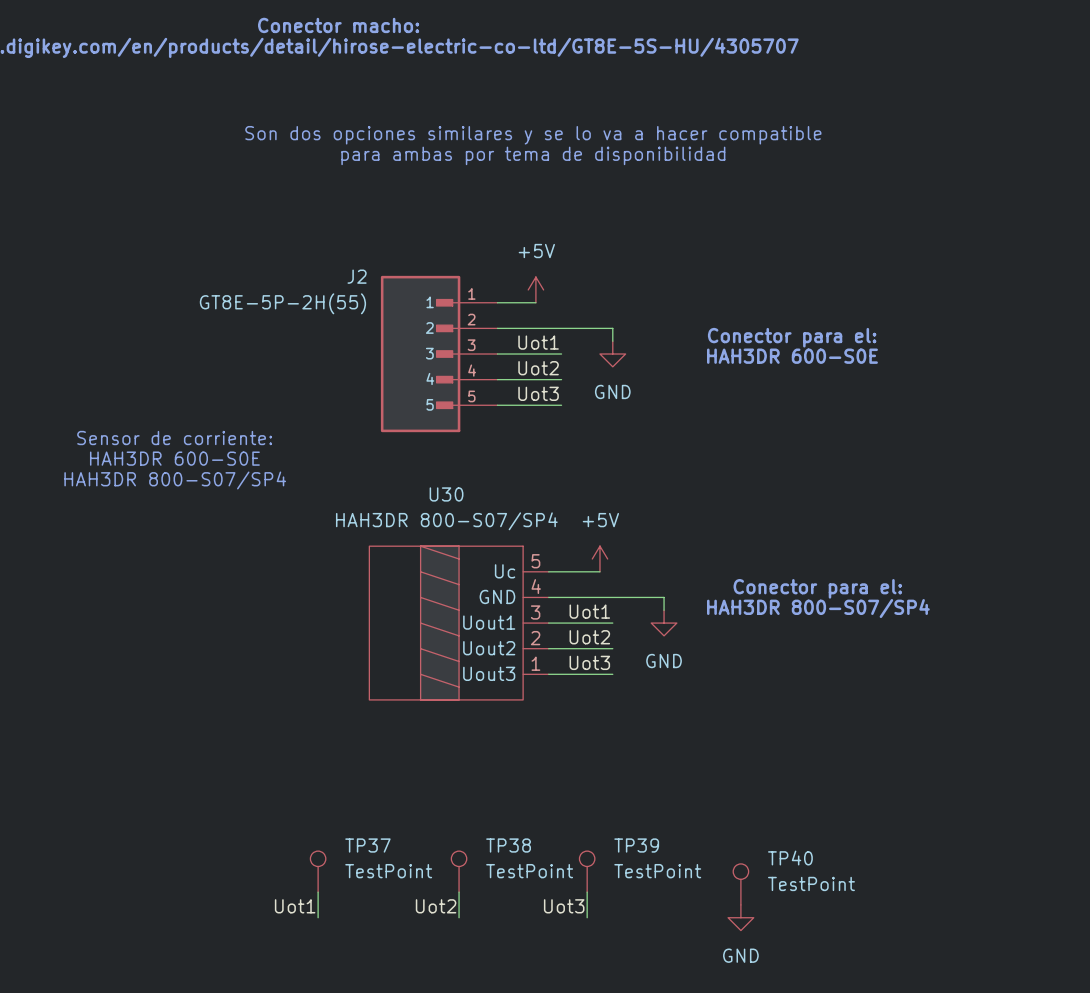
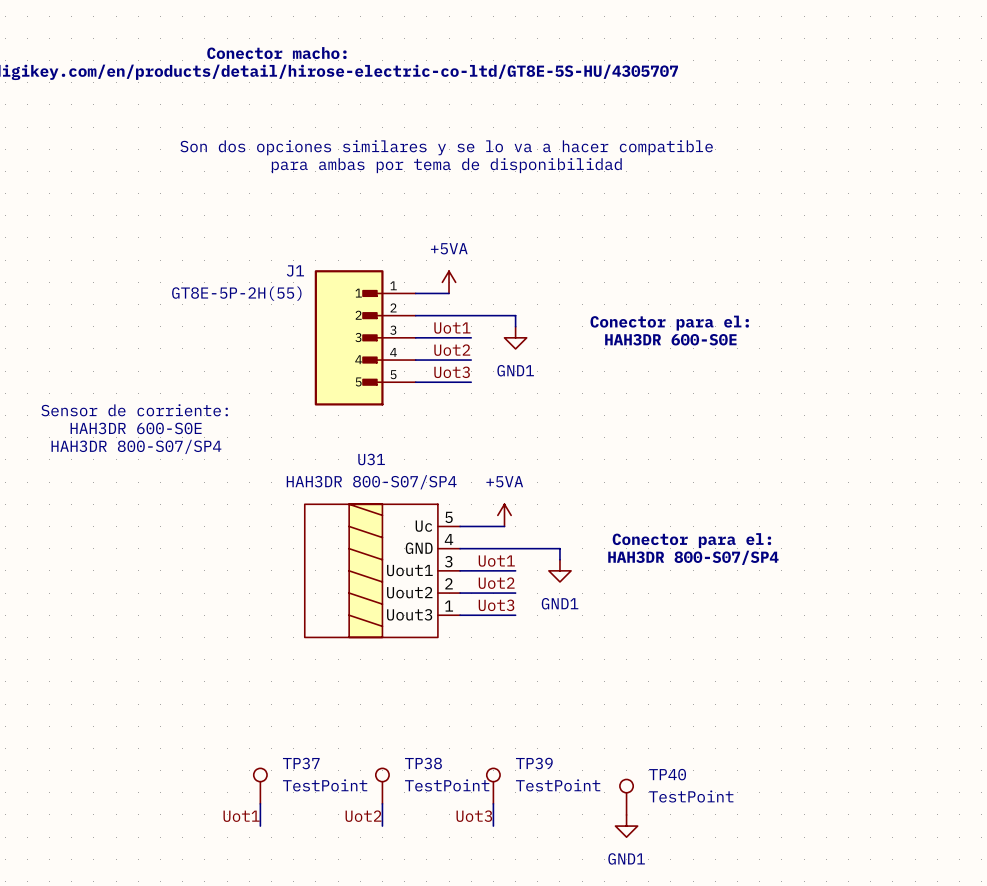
J2 name: J2 (357, 276) -> J1 (295, 270)
power symbol: +5V (535, 289) -> +5VA (449, 282)
power symbol: GND (612, 354) -> GND1 (515, 337)
U30 name: U30 (446, 494) -> U31 (371, 459)
power symbol: +5V (599, 559) -> +5VA (504, 515)
power symbol: GND (664, 623) -> GND1 (559, 570)
power symbol: GND (740, 917) -> GND1 (626, 826)

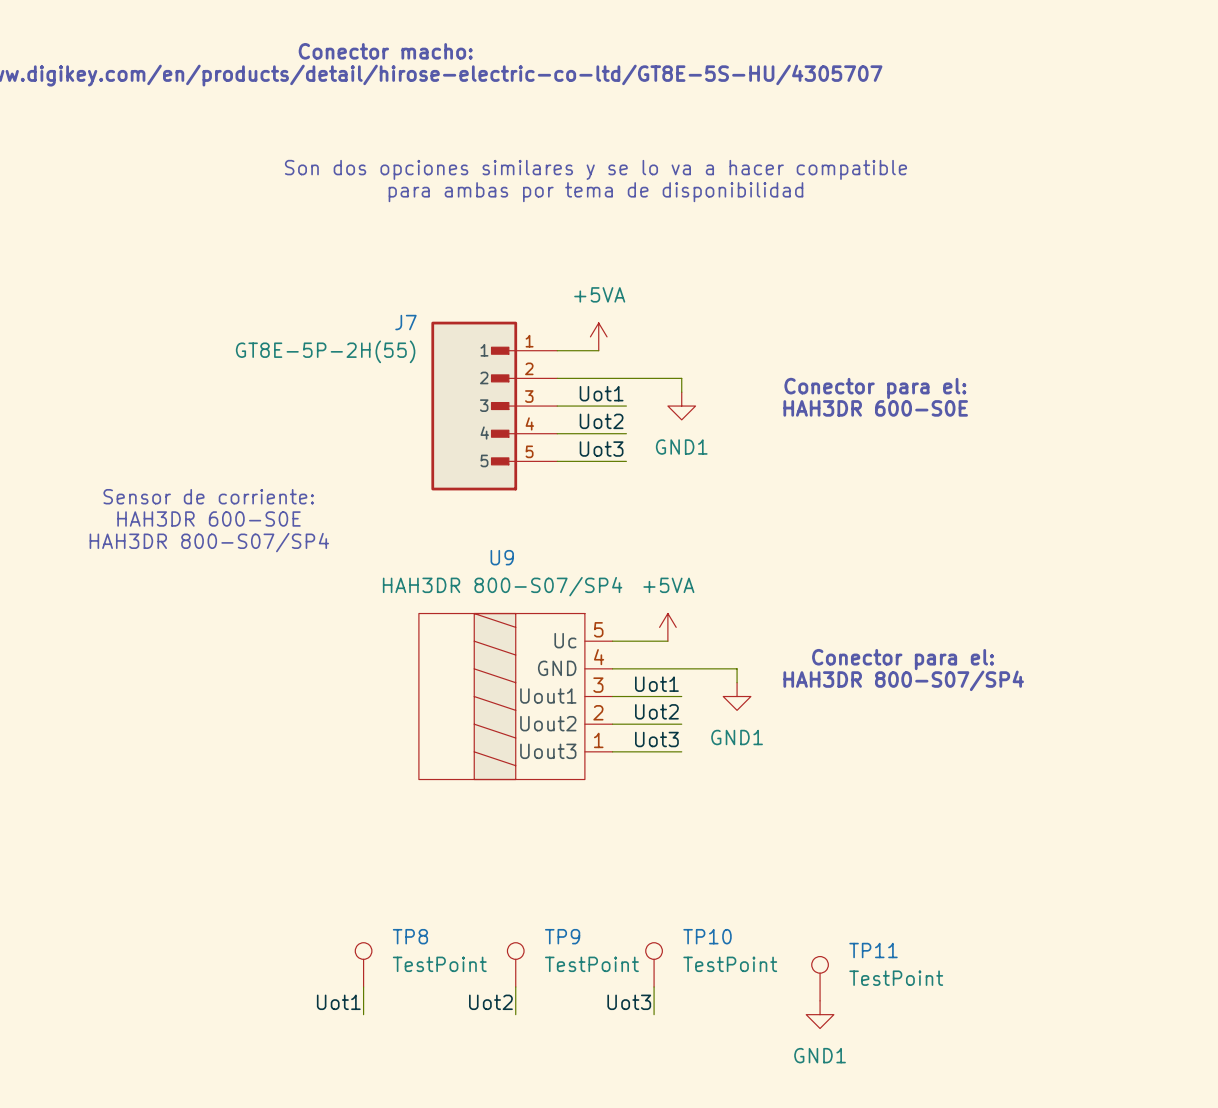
J1 name: J1 (295, 270) -> J7 (405, 322)
U31 name: U31 (371, 459) -> U9 (502, 557)
TP37 name: TP37 (301, 763) -> TP8 (410, 936)
TP38 name: TP38 (423, 763) -> TP9 (562, 936)
TP39 name: TP39 (534, 763) -> TP10 (707, 936)
TP40 name: TP40 (667, 774) -> TP11 (873, 950)

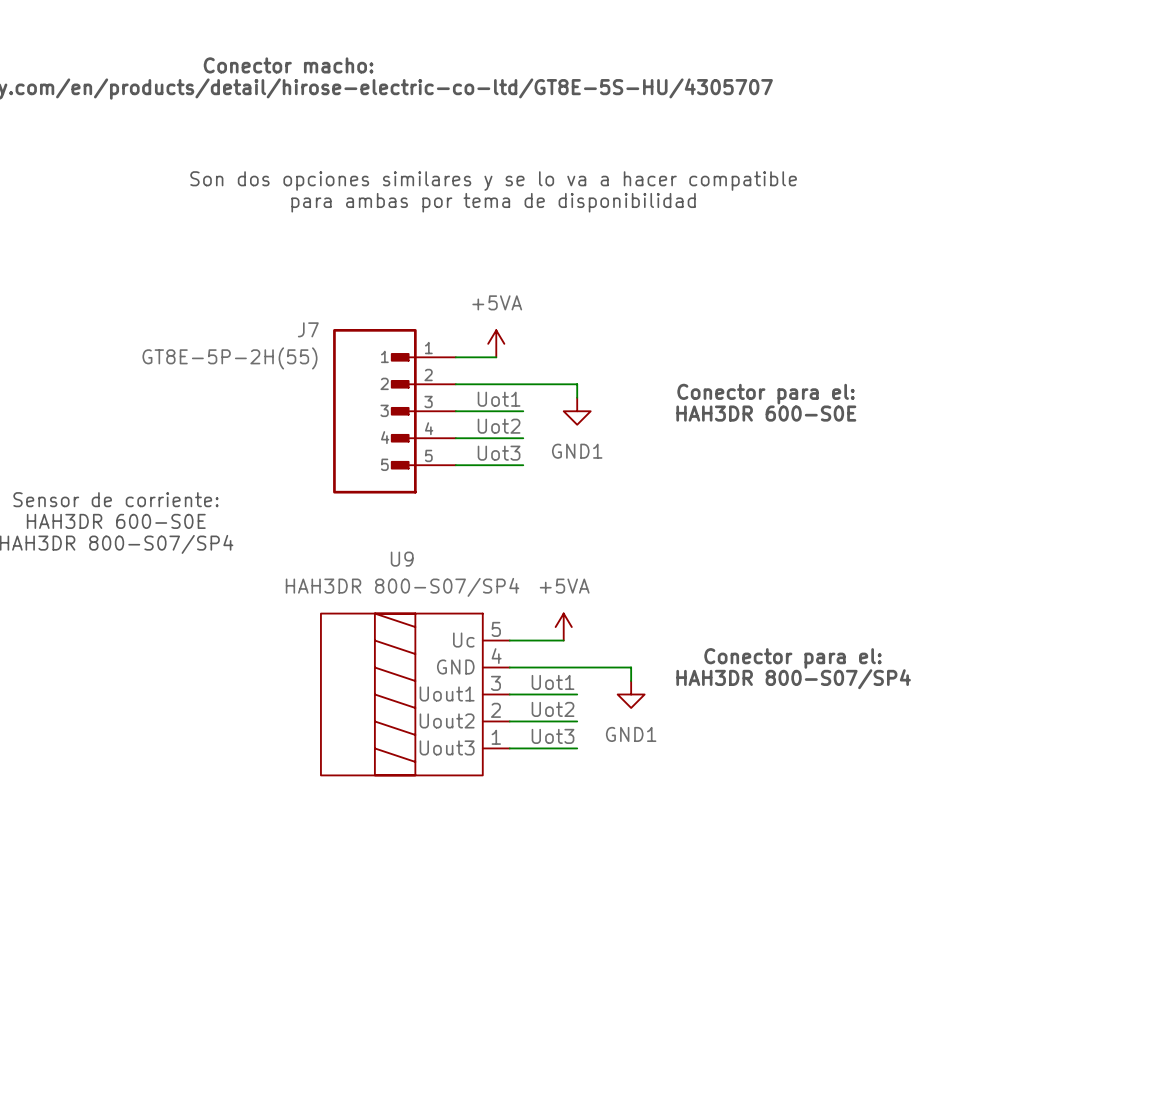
TP8: TestPoint (363, 964) -> none
TP9: TestPoint (515, 964) -> none
TP10: TestPoint (654, 964) -> none
TP11: TestPoint (820, 978) -> none
wire: (363, 986) (363, 1014) -> none
wire: (515, 986) (515, 1014) -> none
wire: (654, 986) (654, 1014) -> none
label: Uot1 (338, 1002) -> none
label: Uot2 (490, 1002) -> none
label: Uot3 (629, 1002) -> none
power symbol: GND1 (820, 1014) -> none

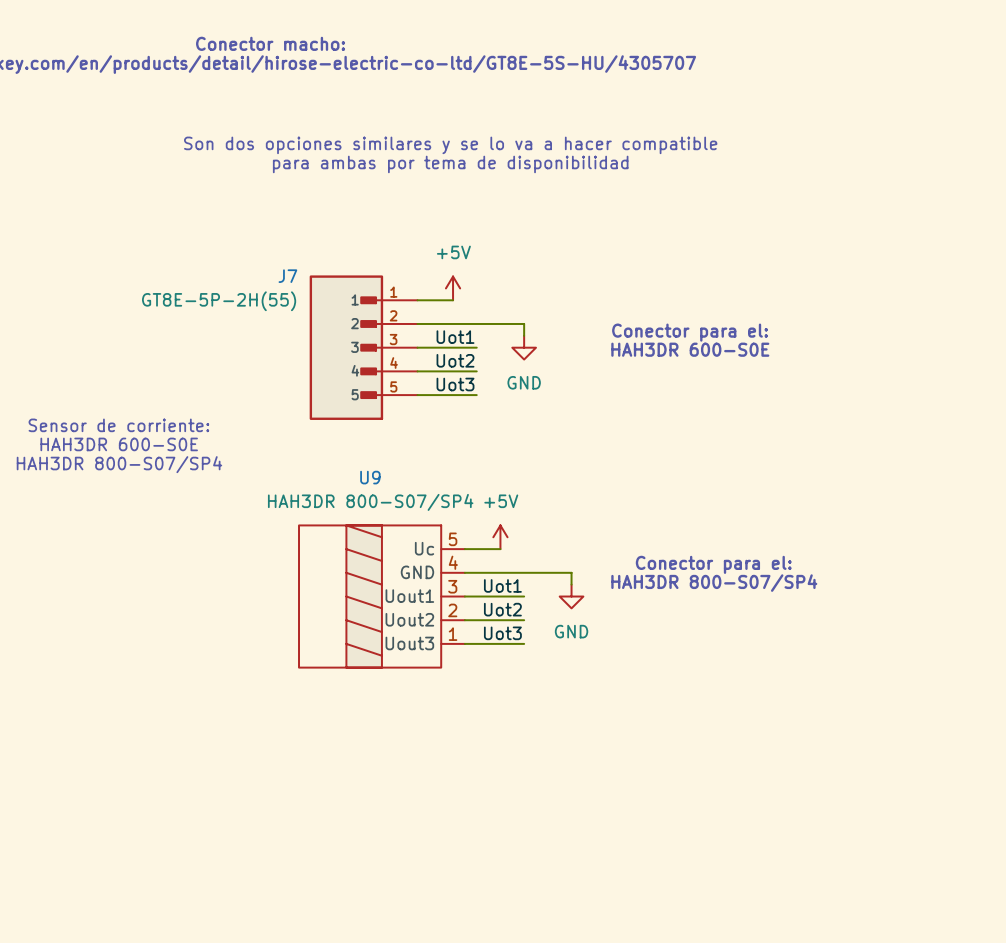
power symbol: +5VA (496, 343) -> +5V (453, 288)
power symbol: GND1 (577, 411) -> GND (524, 347)
power symbol: none -> +5V (500, 537)
power symbol: +5VA (563, 627) -> none
wire: (550, 640) (563, 640) -> none
power symbol: GND1 (631, 694) -> GND (571, 596)

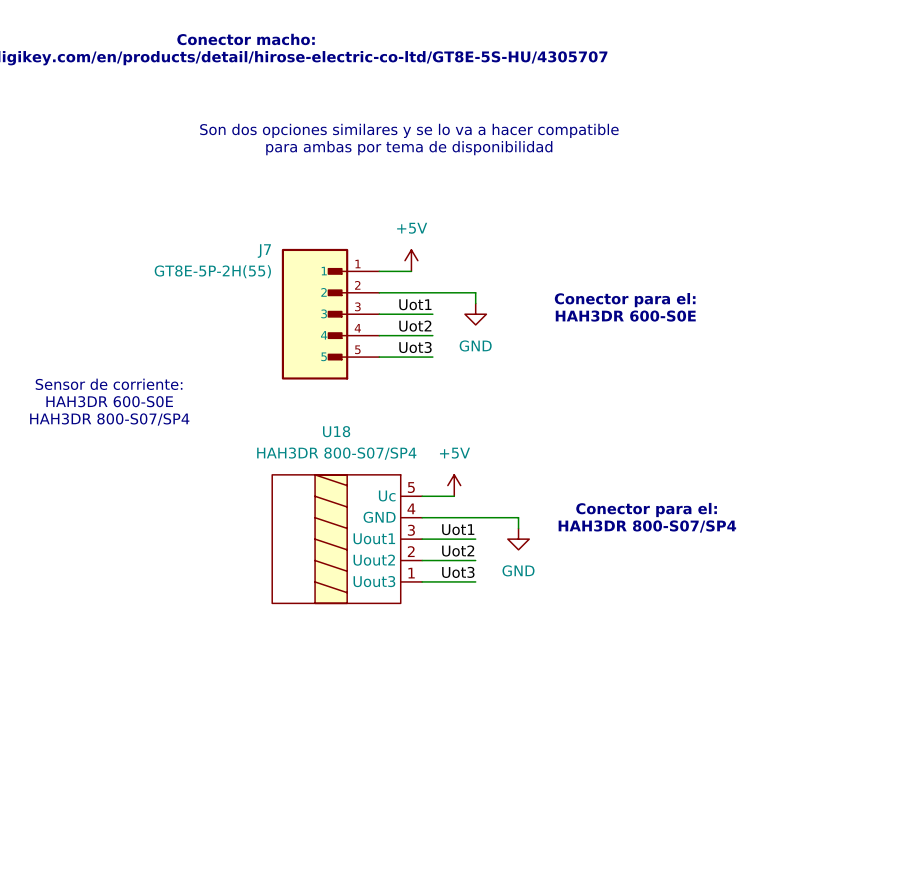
U9 name: U9 (370, 477) -> U18 (336, 431)

